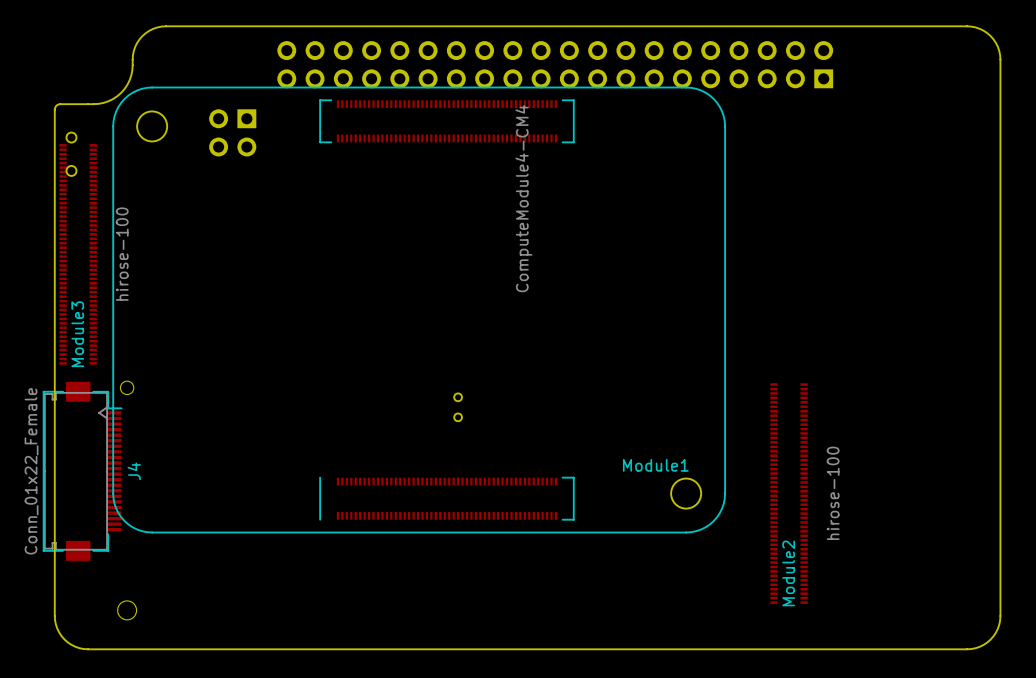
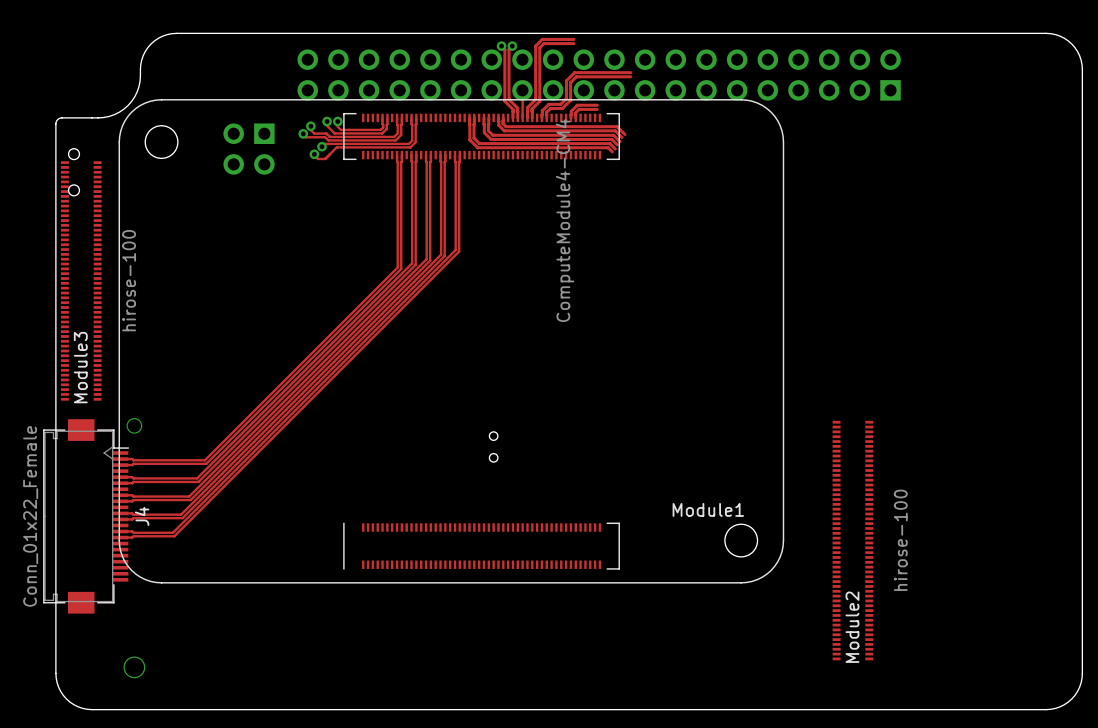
track: none -> (573, 39) (542, 39) (535, 46) (535, 99) (527, 107) (527, 117)
track: none -> (573, 43) (544, 43) (539, 47) (539, 101) (531, 109) (532, 117)
track: none -> (501, 46) (504, 49) (504, 101) (513, 109) (512, 117)
via: none -> (501, 46)
track: none -> (512, 46) (509, 49) (509, 99) (517, 107) (517, 117)
via: none -> (512, 46)
track: none -> (630, 72) (574, 72) (566, 80) (566, 98) (560, 104) (548, 104) (542, 110) (541, 117)
track: none -> (630, 76) (576, 76) (570, 82) (570, 100) (562, 108) (550, 108) (546, 112) (546, 117)
track: none -> (522, 90) (522, 117)
track: none -> (597, 105) (577, 105) (571, 111) (570, 117)
track: none -> (597, 109) (579, 109) (575, 113) (575, 117)
track: none -> (382, 117) (383, 127) (380, 129) (340, 129) (337, 126) (337, 121)
track: none -> (387, 117) (386, 128) (382, 133) (334, 133) (327, 125) (327, 121)
track: none -> (397, 117) (397, 133) (394, 136) (329, 136) (326, 133) (314, 133) (310, 130) (310, 126)
track: none -> (401, 117) (401, 134) (395, 140) (328, 140) (325, 137) (305, 137) (303, 133)
track: none -> (411, 117) (412, 140) (409, 143) (324, 143) (321, 146)
track: none -> (416, 117) (415, 142) (410, 147) (336, 147) (325, 158) (317, 158) (314, 154)
track: none -> (469, 117) (469, 139) (477, 147) (608, 147) (612, 151)
track: none -> (474, 117) (473, 138) (479, 143) (609, 143) (615, 149)
track: none -> (483, 117) (484, 132) (491, 139) (611, 139) (617, 144)
track: none -> (488, 117) (488, 130) (492, 135) (613, 135) (620, 141)
track: none -> (498, 117) (498, 125) (504, 130) (615, 130) (622, 137)
track: none -> (503, 117) (502, 123) (505, 126) (617, 126) (624, 134)
via: none -> (327, 121)
via: none -> (337, 121)
via: none -> (310, 126)
via: none -> (303, 133)
via: none -> (321, 146)
via: none -> (314, 154)
track: none -> (397, 155) (397, 267) (204, 460) (120, 459)
track: none -> (401, 155) (401, 268) (206, 463) (120, 465)
track: none -> (411, 155) (412, 263) (197, 478) (120, 477)
track: none -> (416, 155) (415, 264) (198, 481) (120, 483)
track: none -> (426, 155) (426, 259) (189, 496) (120, 495)
track: none -> (430, 155) (430, 260) (190, 500) (120, 501)
track: none -> (440, 155) (441, 254) (181, 514) (120, 513)
track: none -> (445, 155) (444, 255) (182, 518) (120, 519)
track: none -> (455, 155) (455, 250) (172, 532) (120, 531)
track: none -> (459, 155) (459, 251) (174, 536) (120, 537)

